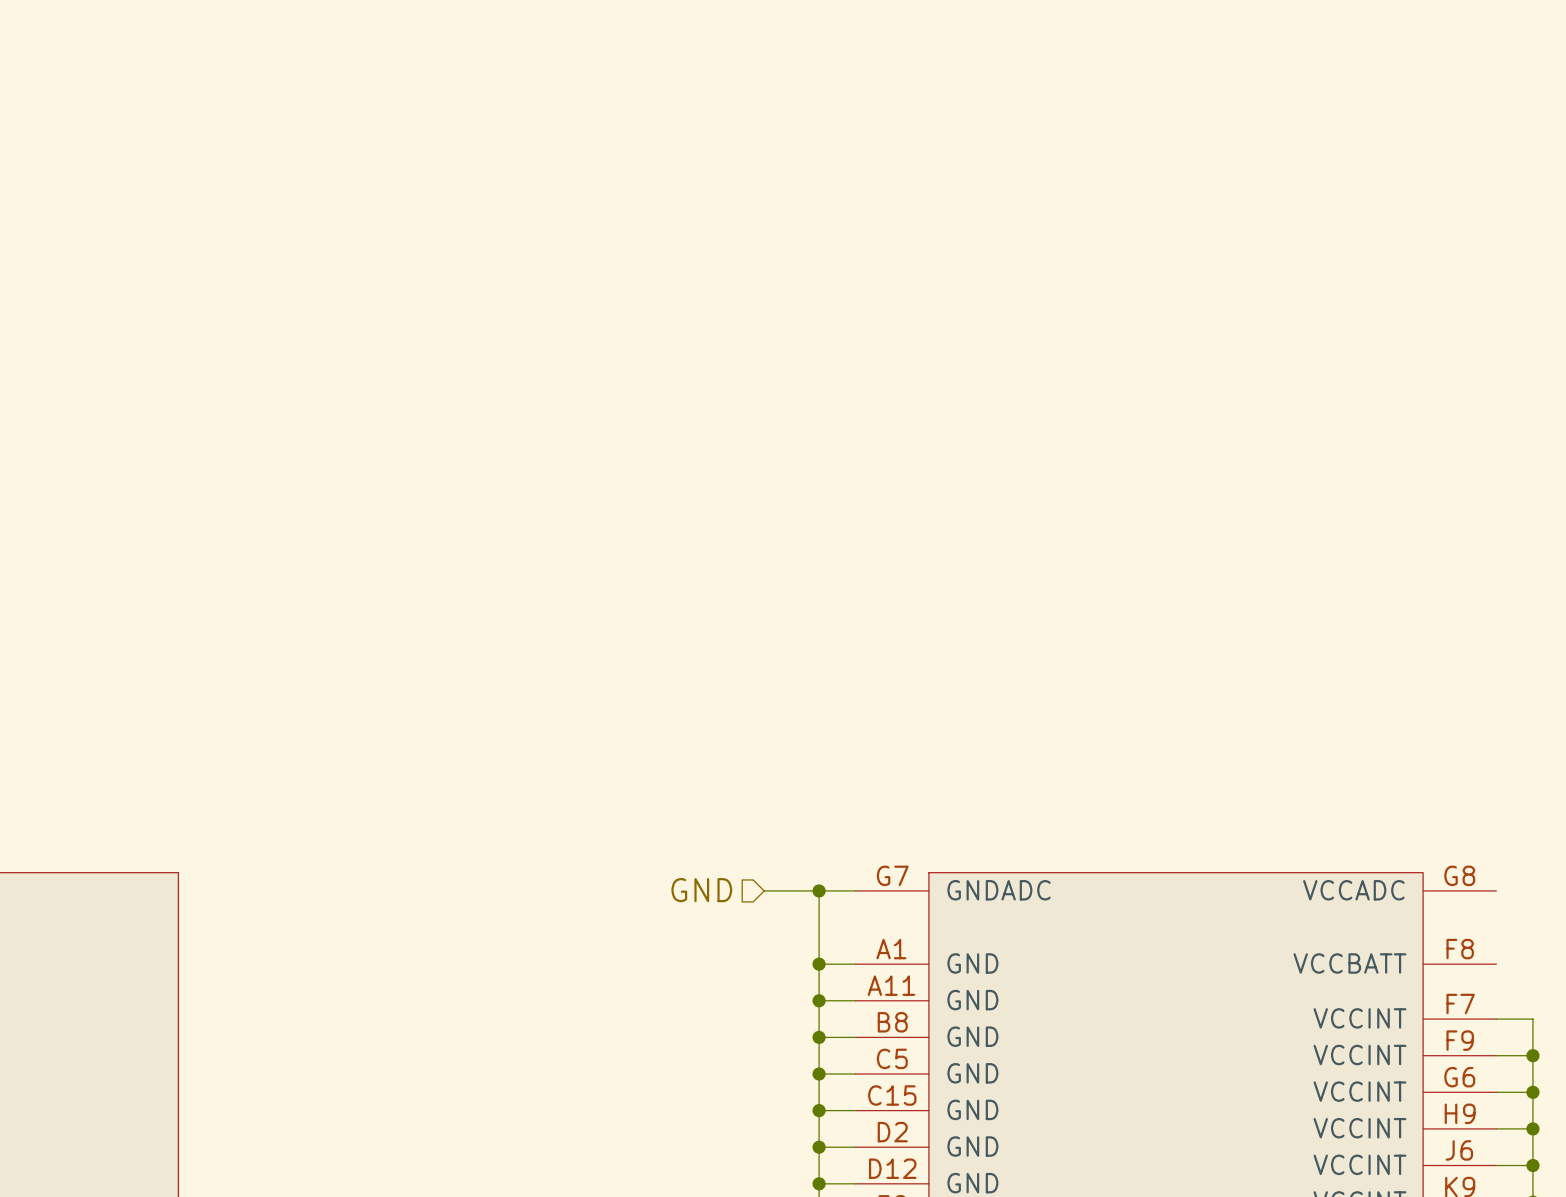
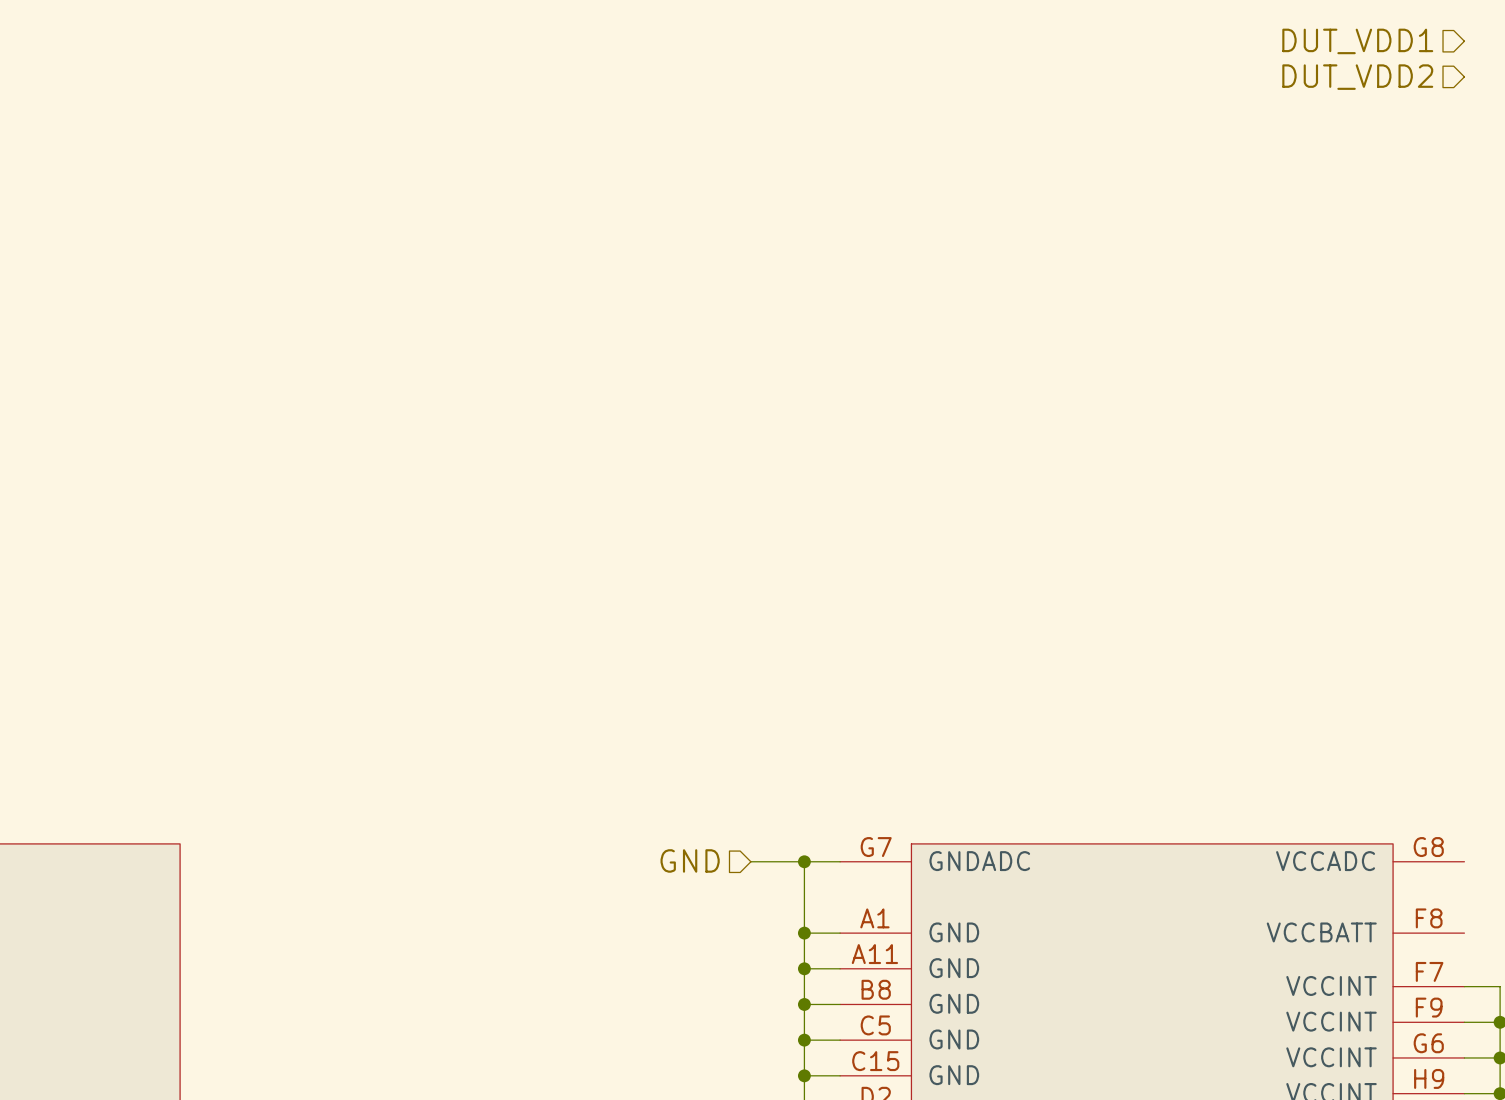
hierarchical label: none -> DUT_VDD1 (1357, 41)
hierarchical label: none -> DUT_VDD2 (1357, 77)

